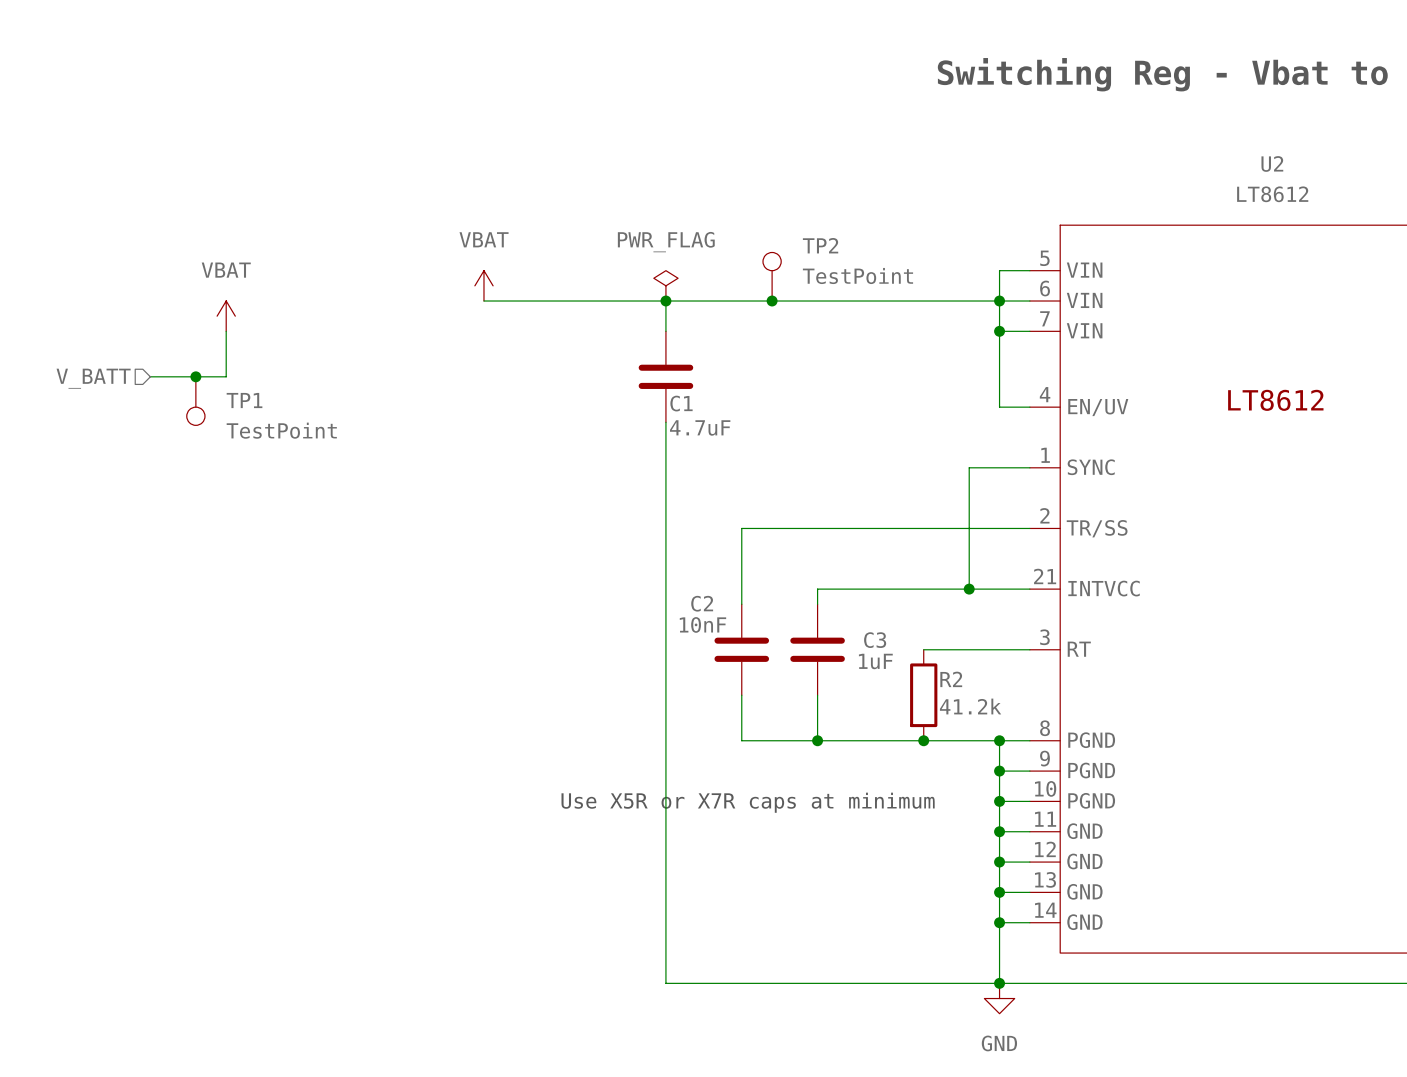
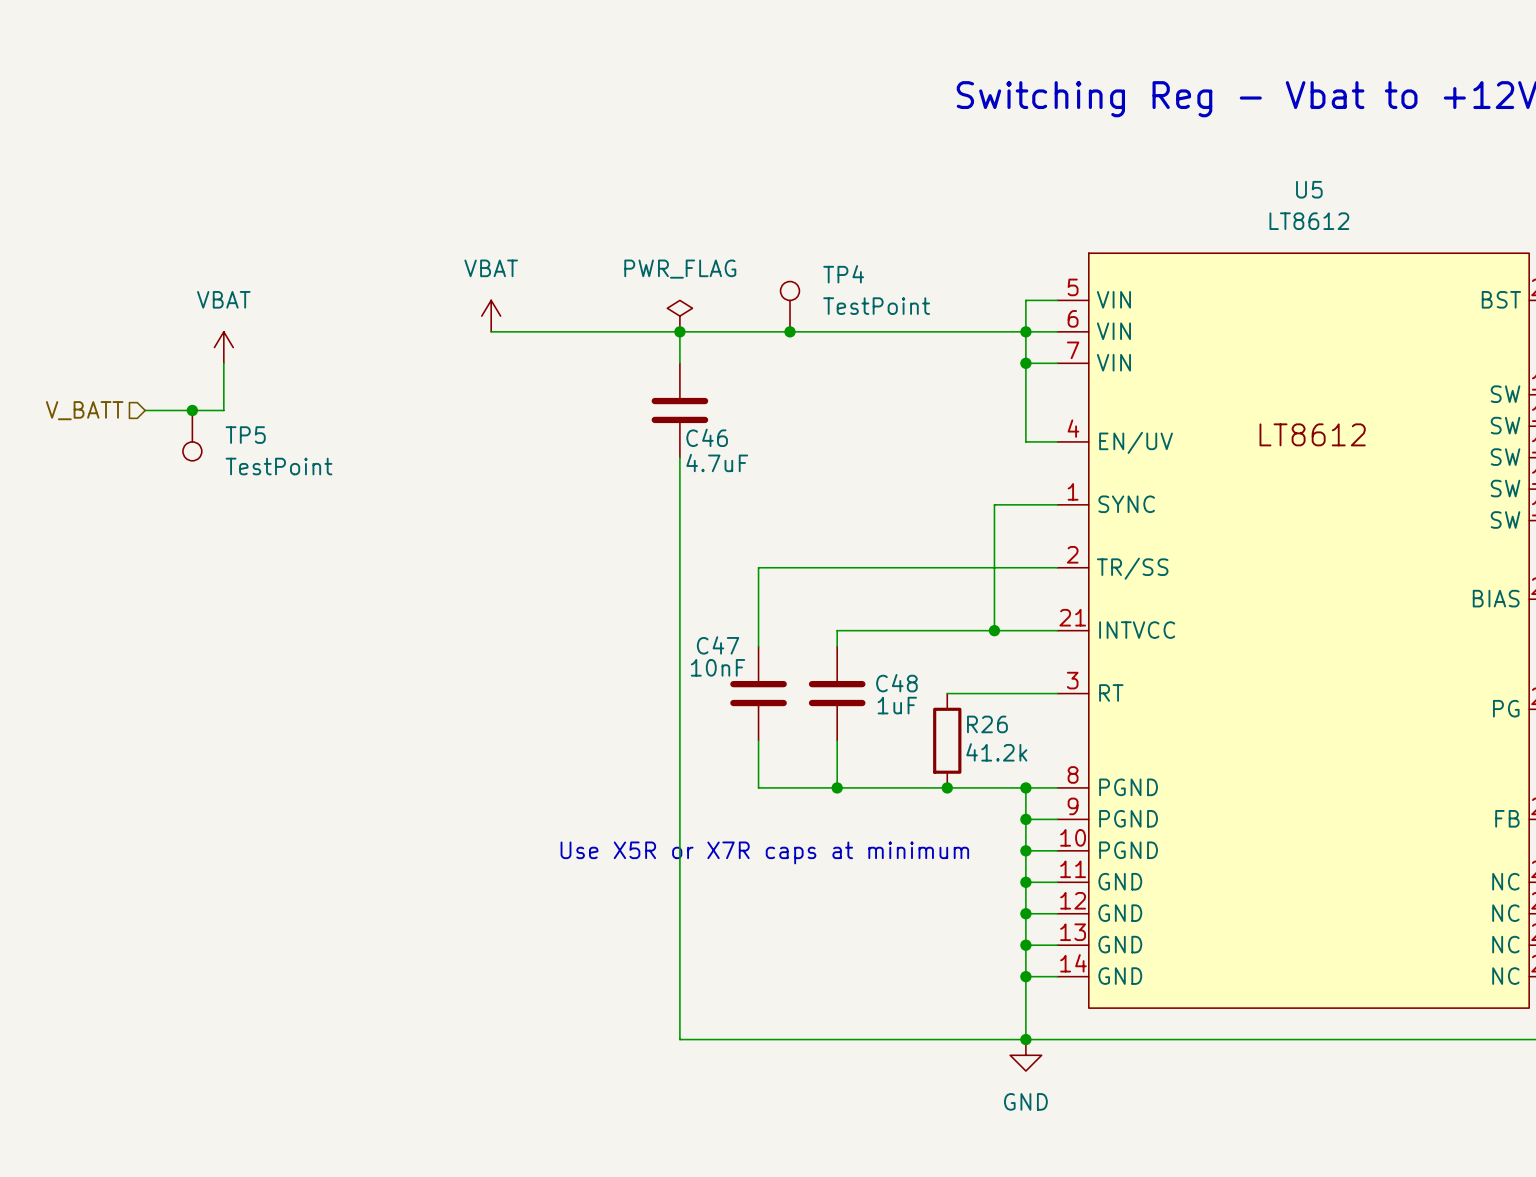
U2 name: U2 (1272, 163) -> U5 (1309, 189)
TP2 name: TP2 (820, 245) -> TP4 (843, 274)
TP1 name: TP1 (244, 400) -> TP5 (245, 435)
C1 name: C1 (681, 403) -> C46 (707, 437)
C2 name: C2 (702, 603) -> C47 (718, 645)
C3 name: C3 (875, 640) -> C48 (896, 683)
R2 name: R2 (951, 679) -> R26 (987, 724)

